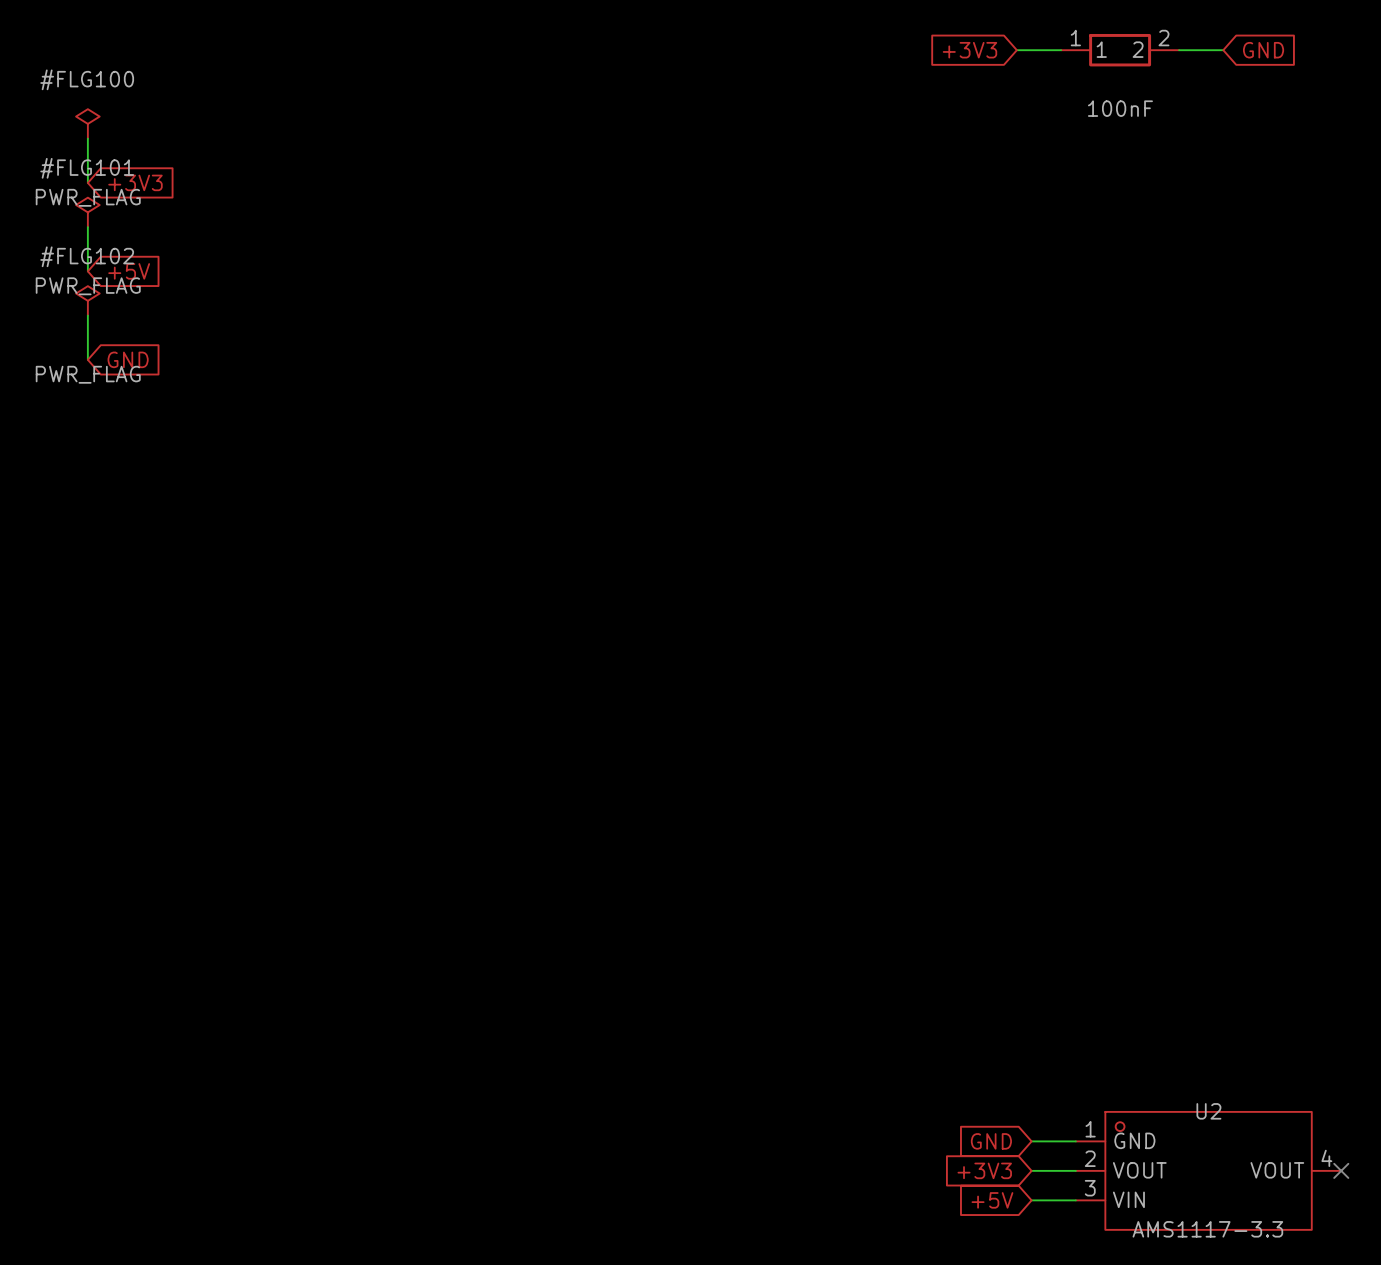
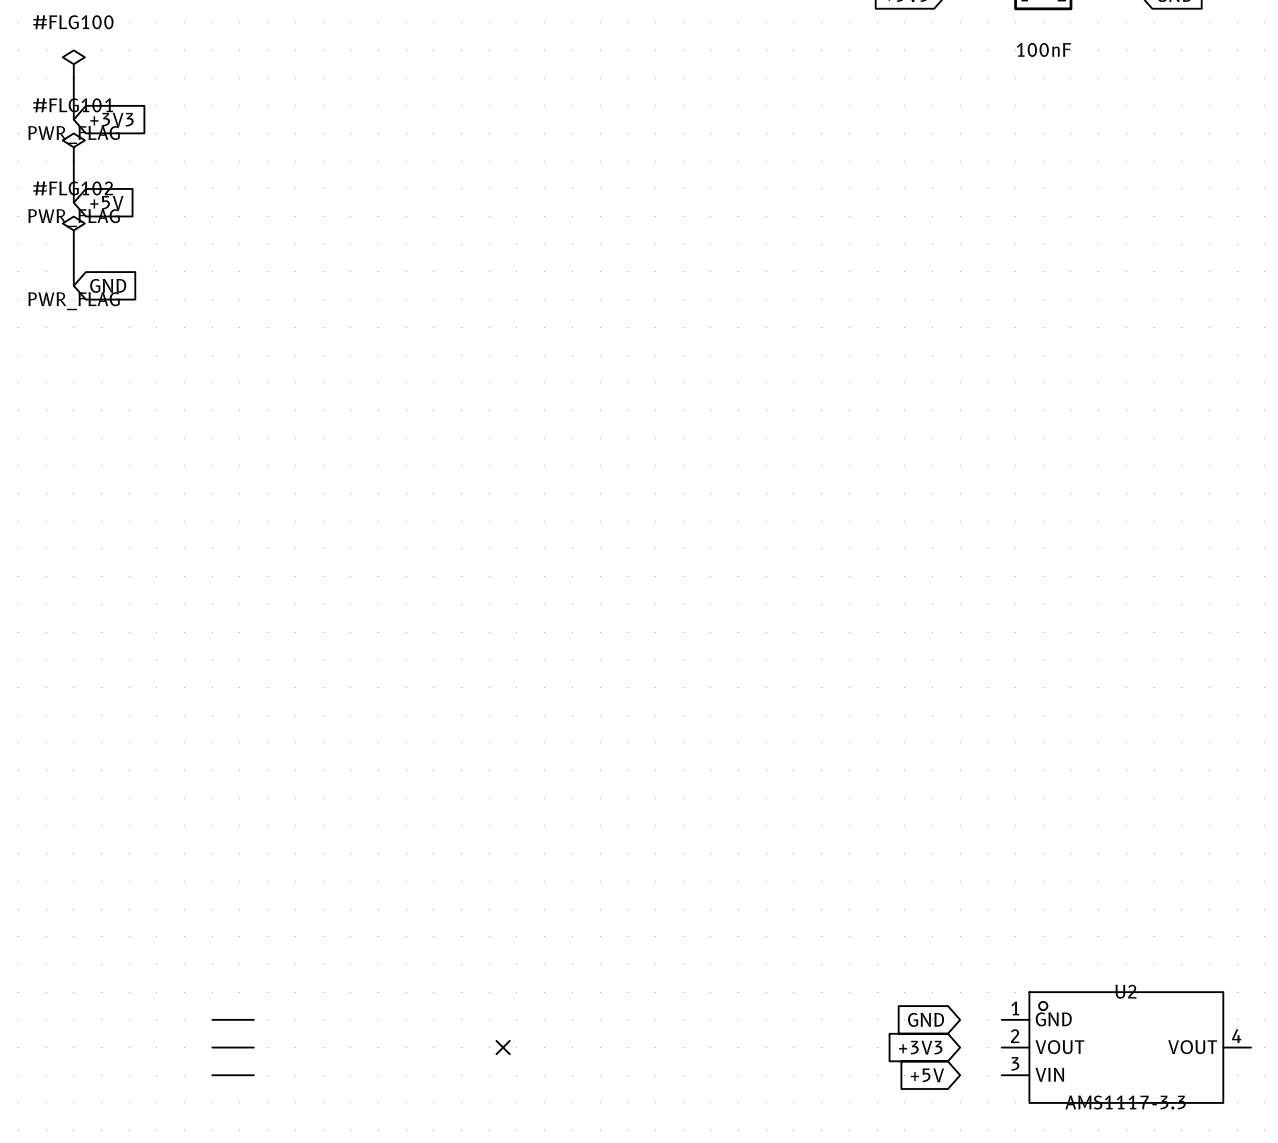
wire: none -> (212, 1019) (253, 1019)
wire: (1031, 1141) (1075, 1141) -> none
wire: none -> (212, 1047) (253, 1047)
no-connect mark: none -> (503, 1047)
wire: (1031, 1170) (1075, 1170) -> none
no-connect mark: (1341, 1170) -> none
wire: none -> (212, 1075) (253, 1075)
wire: (1031, 1200) (1075, 1200) -> none

